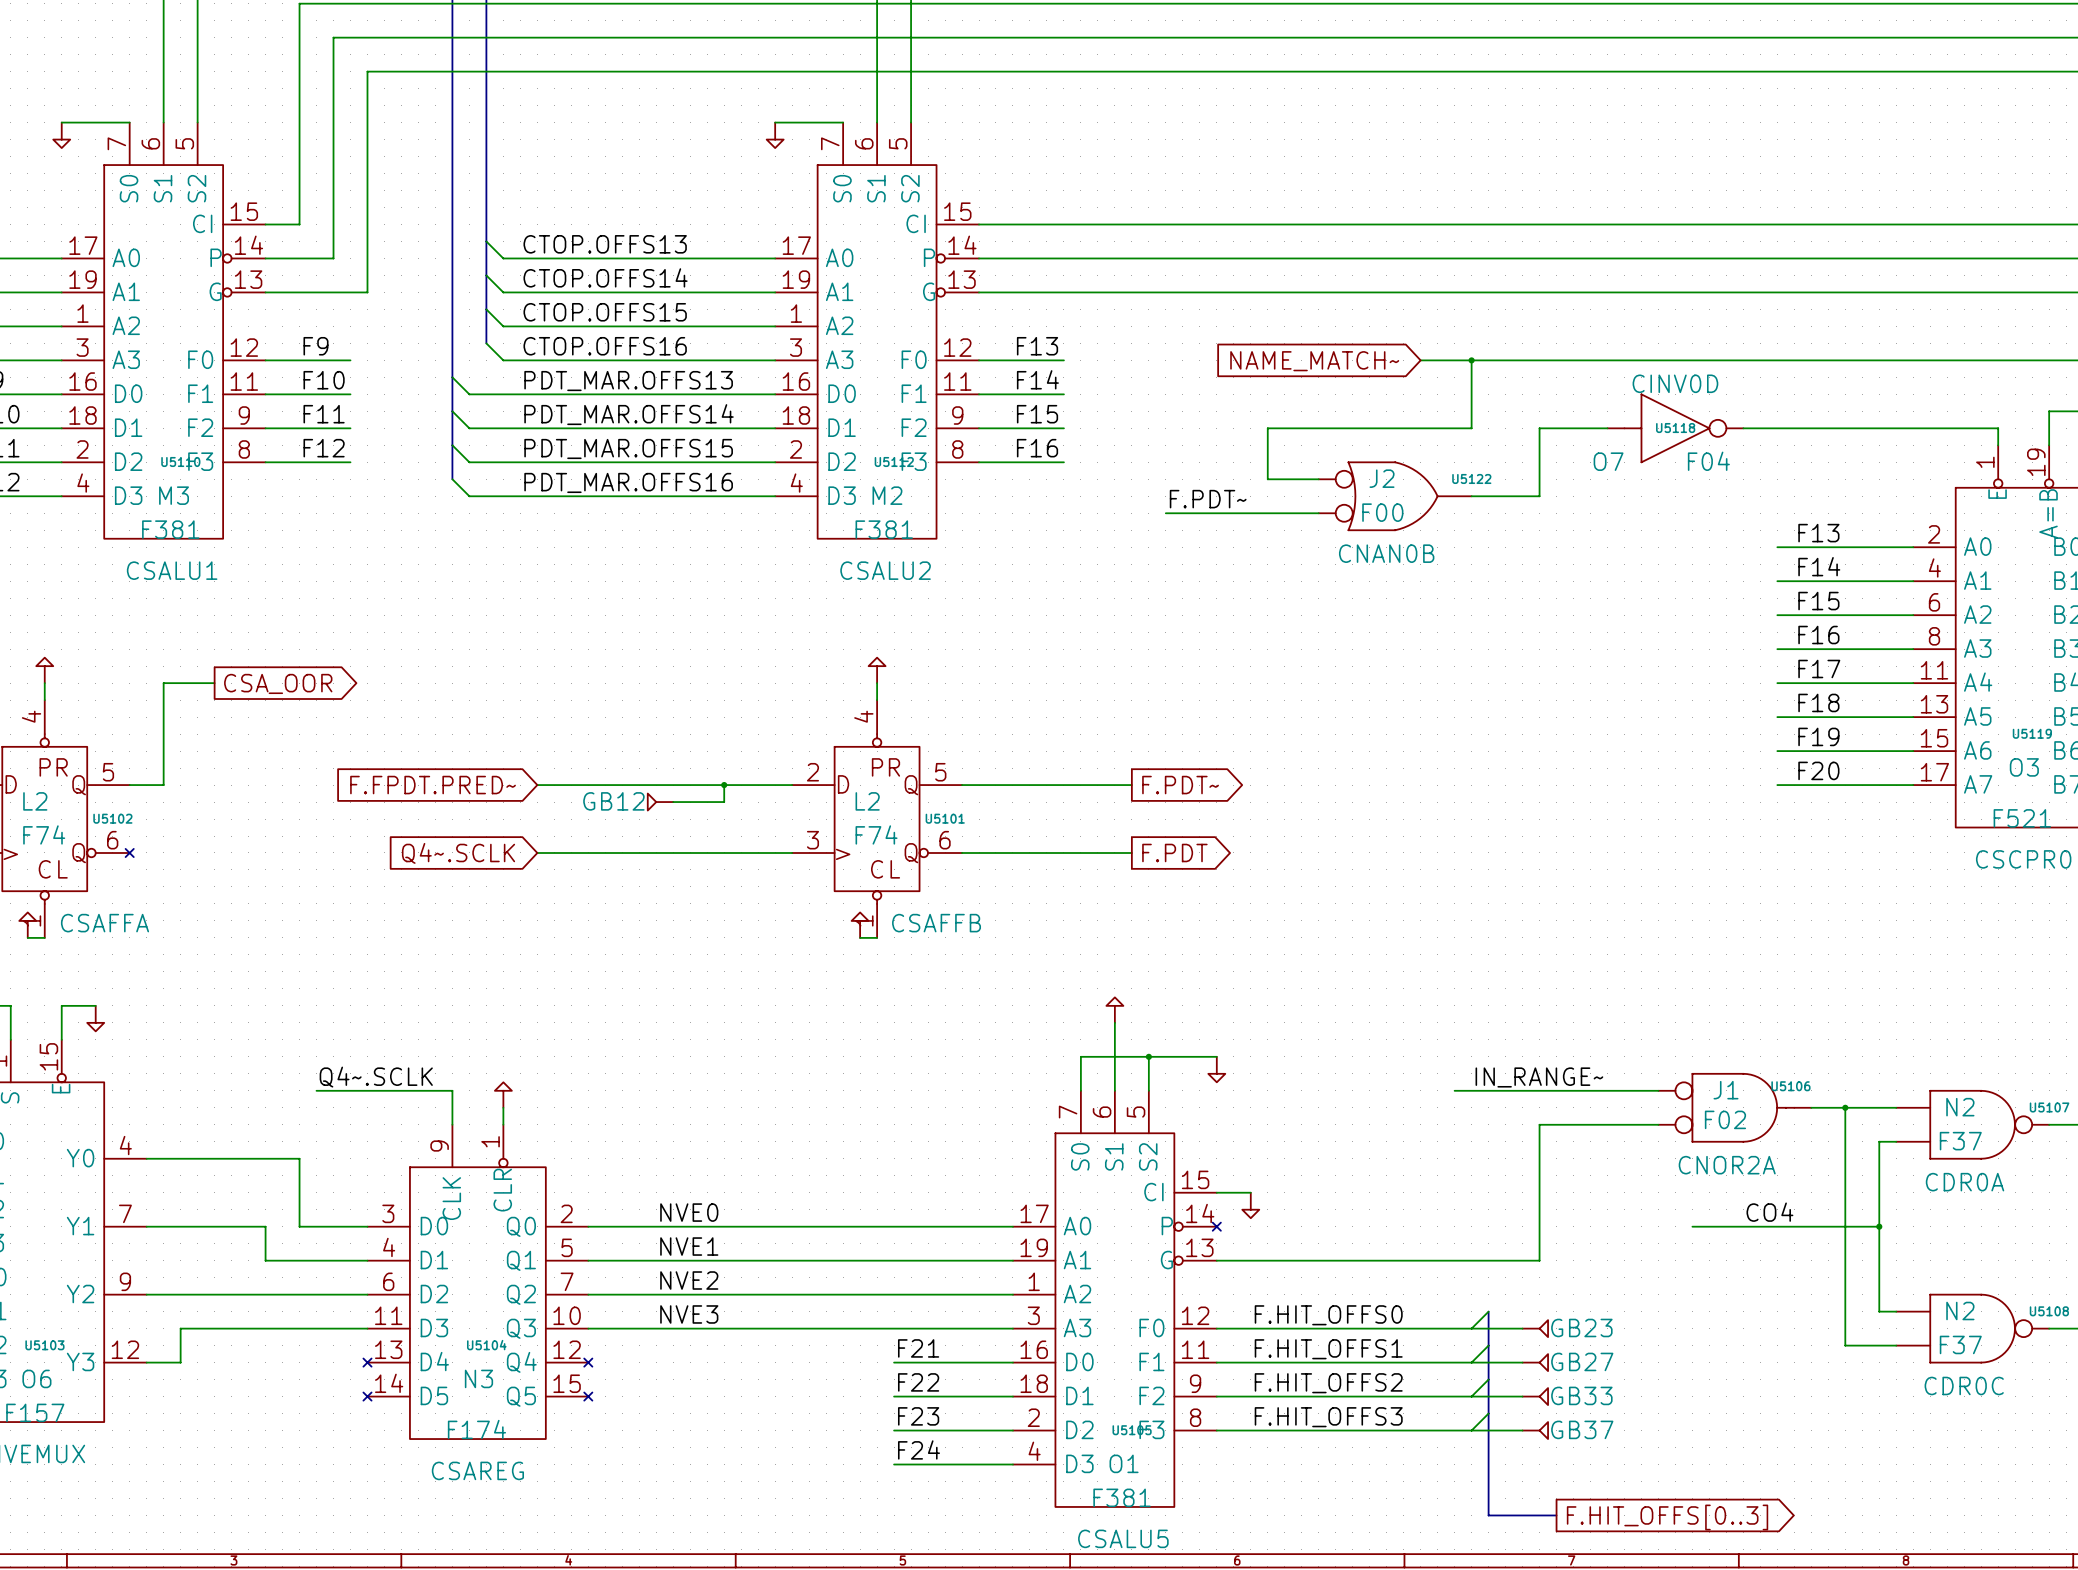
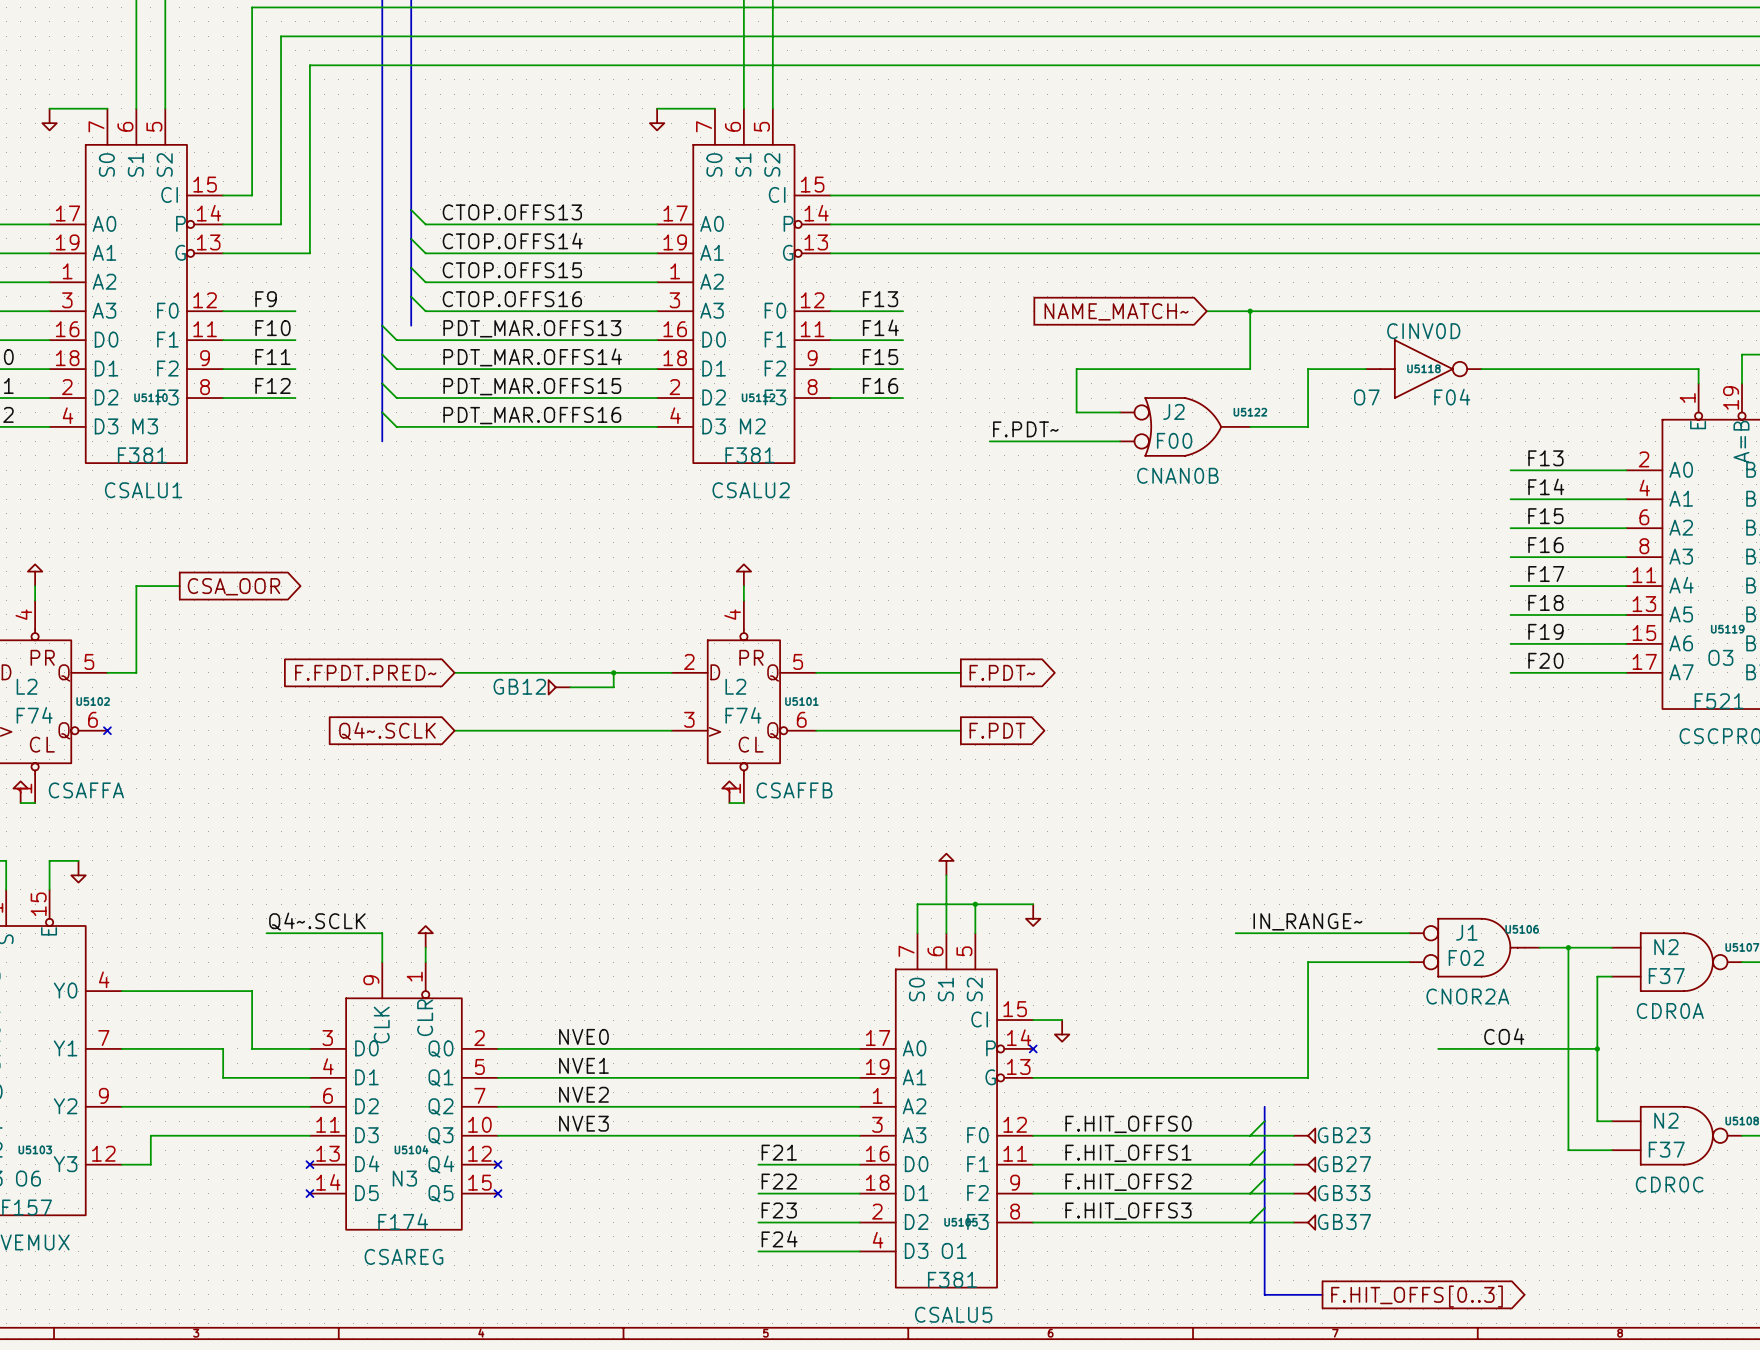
bus: none -> (411, 296) (411, 325)
bus: none -> (382, 412) (382, 441)
bus: none -> (1264, 1106) (1264, 1121)

